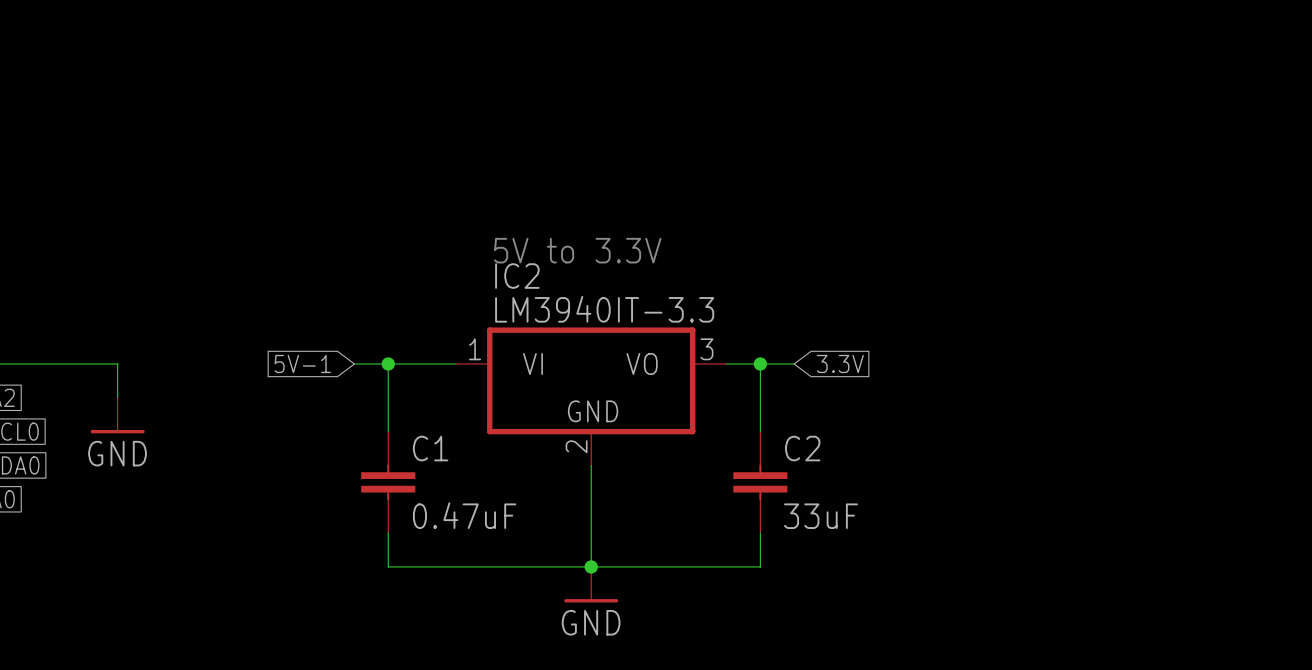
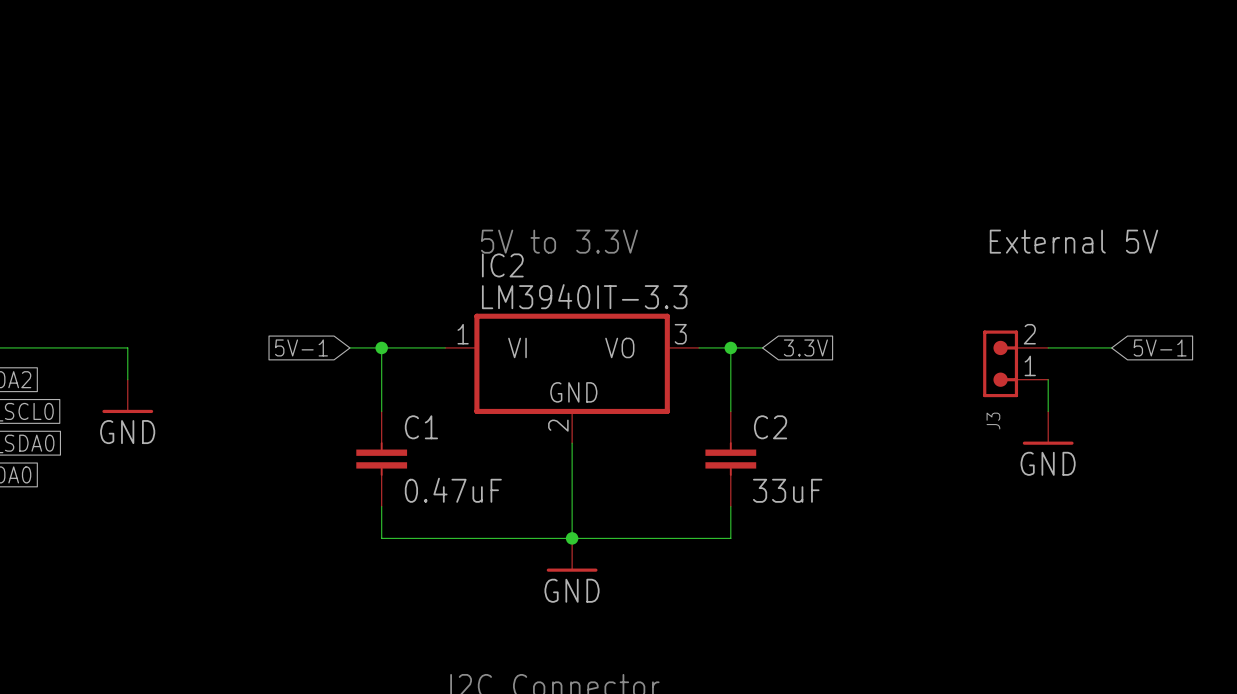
text: none -> External 5V (1073, 241)
wire: none -> (1048, 347) (1111, 347)
global label: none -> 5V-1 (1160, 347)
J3: none -> (1015, 363)
wire: none -> (1048, 379) (1048, 411)
power symbol: none -> GND (1048, 428)

